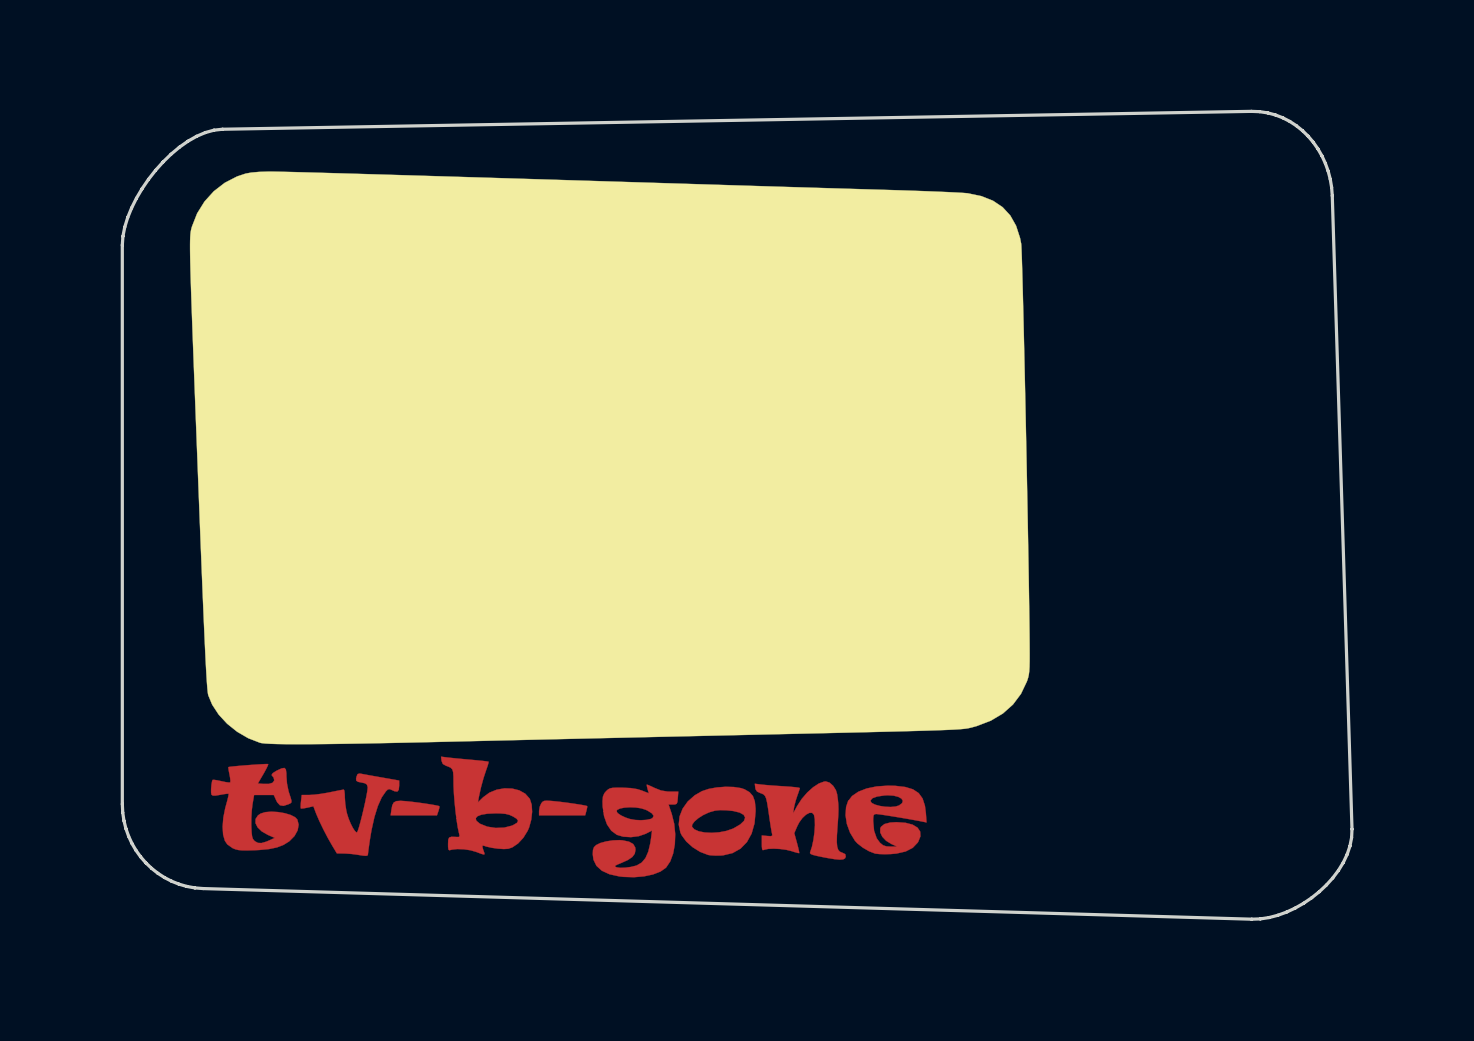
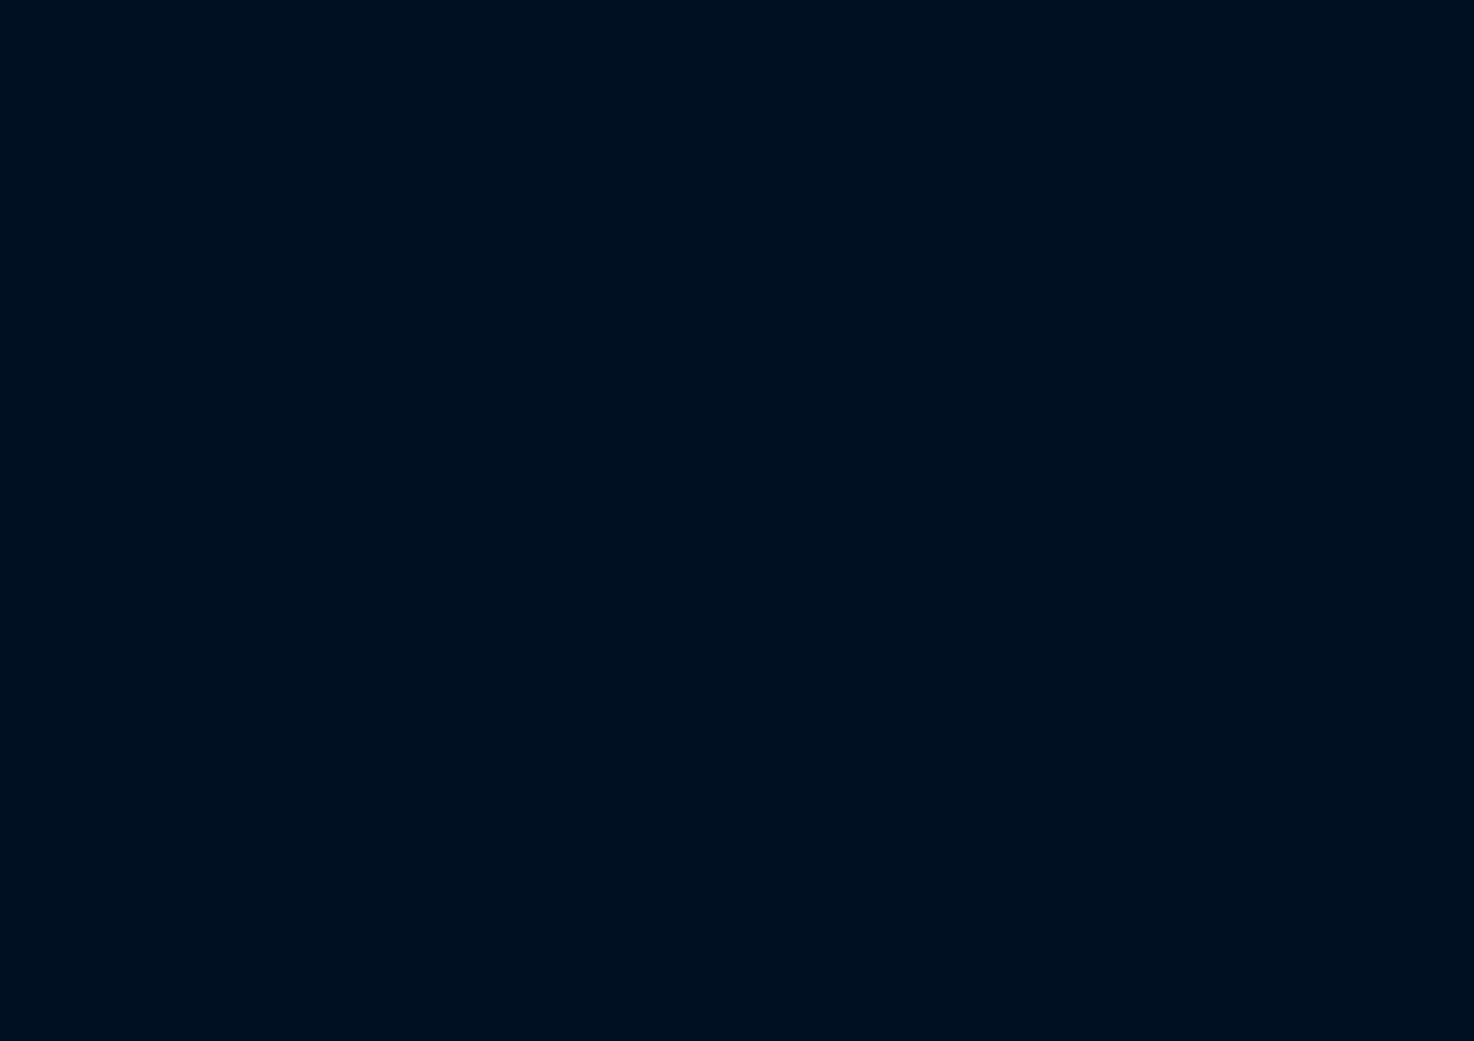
board edge: (1251, 111) (222, 129) (205, 132) (187, 141) (163, 162) (142, 188) (127, 217) (122, 236) (122, 804) (125, 828) (136, 850) (151, 868) (164, 877) (186, 886) (203, 888) (1251, 919) (1277, 915) (1303, 903) (1326, 885) (1338, 870) (1349, 846) (1351, 829) (1332, 195) (1325, 163) (1308, 136) (1296, 125) (1282, 117) (1267, 112) (1251, 111) -> none
drawing: [189, 171, 1030, 878] -> none

